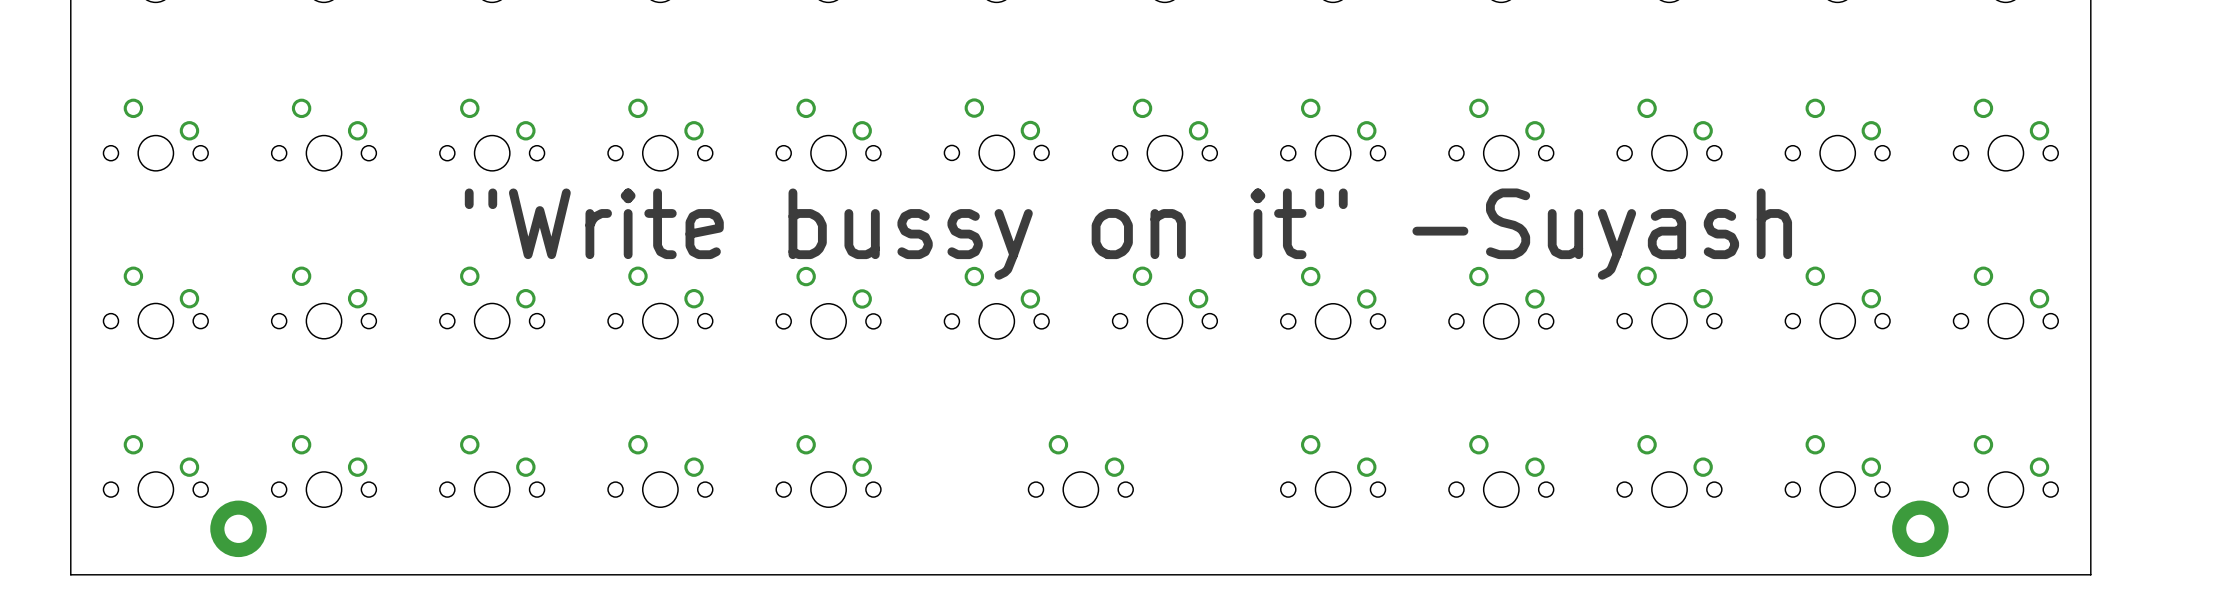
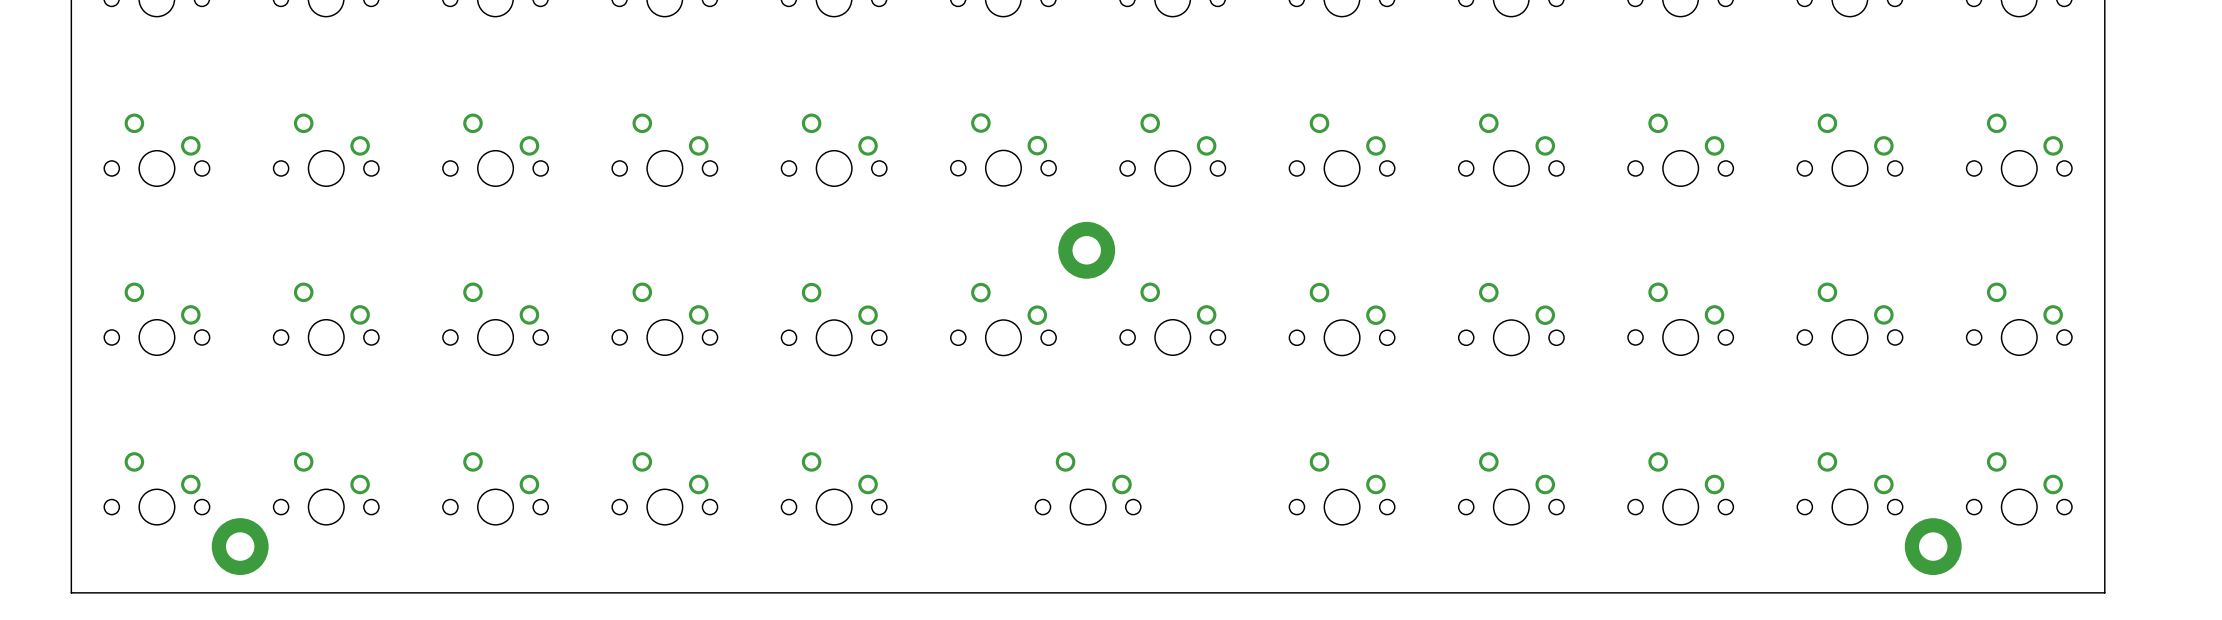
part: none -> (1086, 250)
text: "Write bussy on it" -Suyash (1128, 234) -> none

